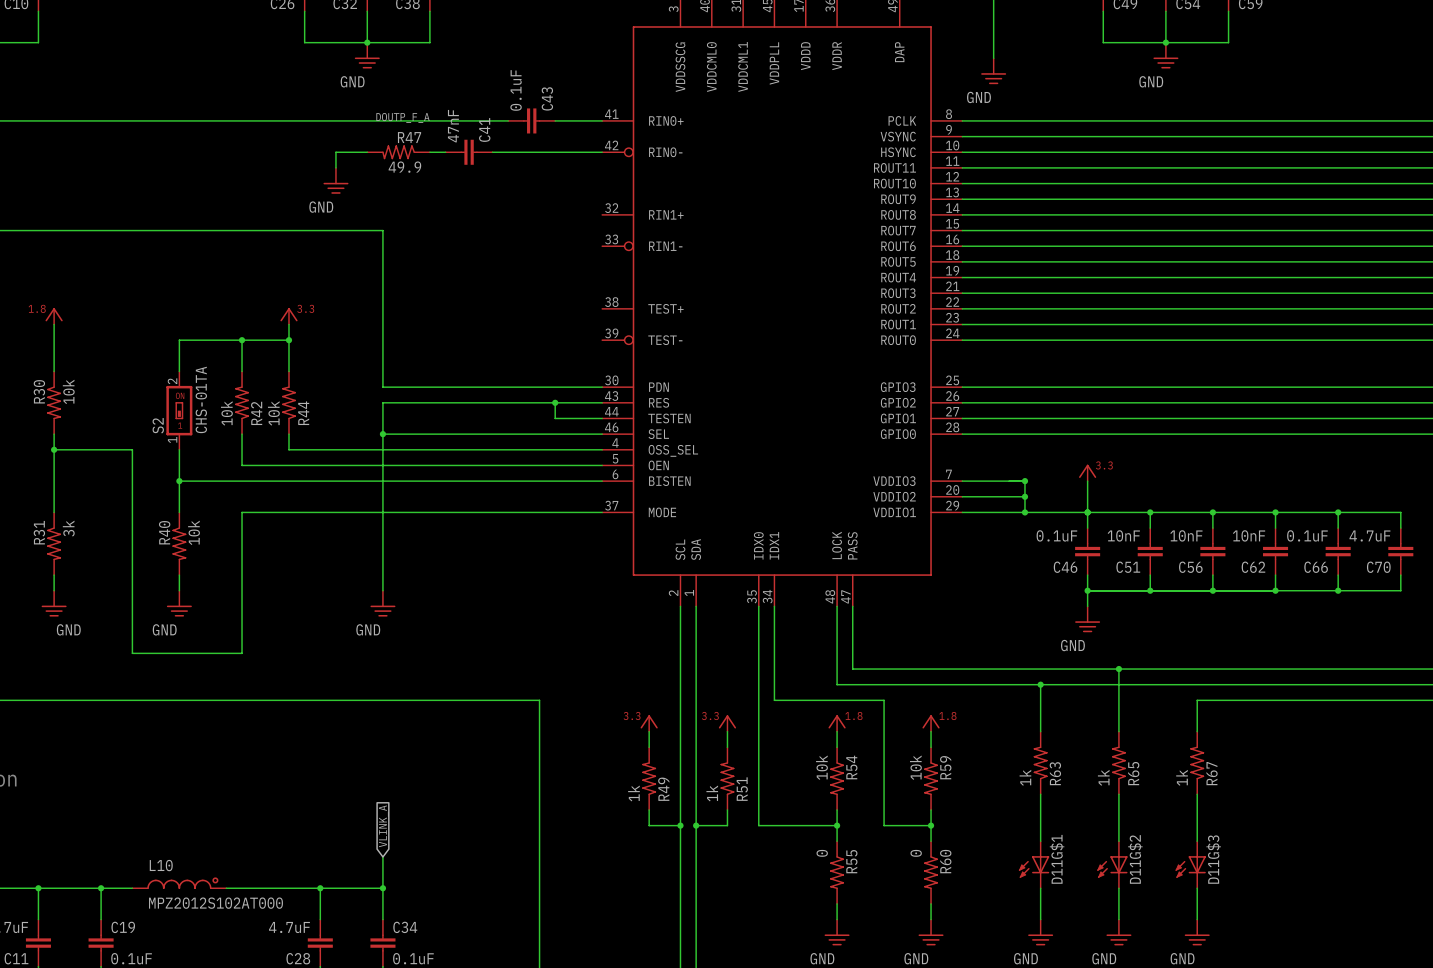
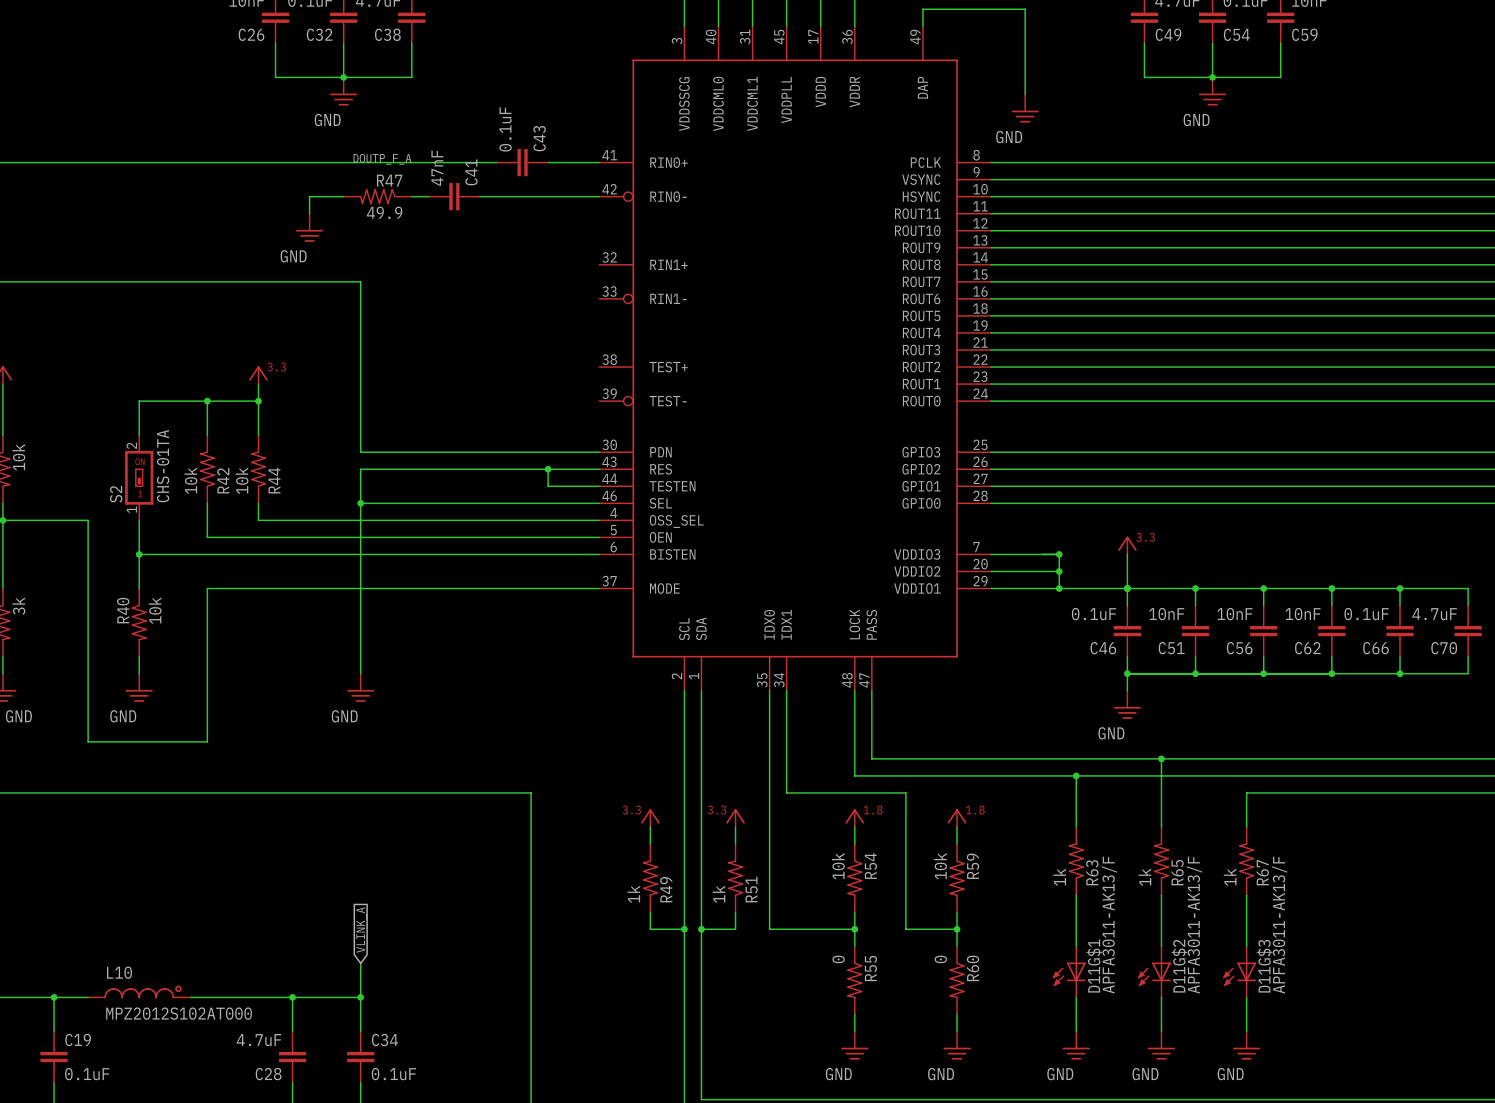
D11G$1 value: none -> APFA3011-AK13/F (1109, 925)
D11G$2 value: none -> APFA3011-AK13/F (1194, 925)
D11G$3 value: none -> APFA3011-AK13/F (1279, 925)

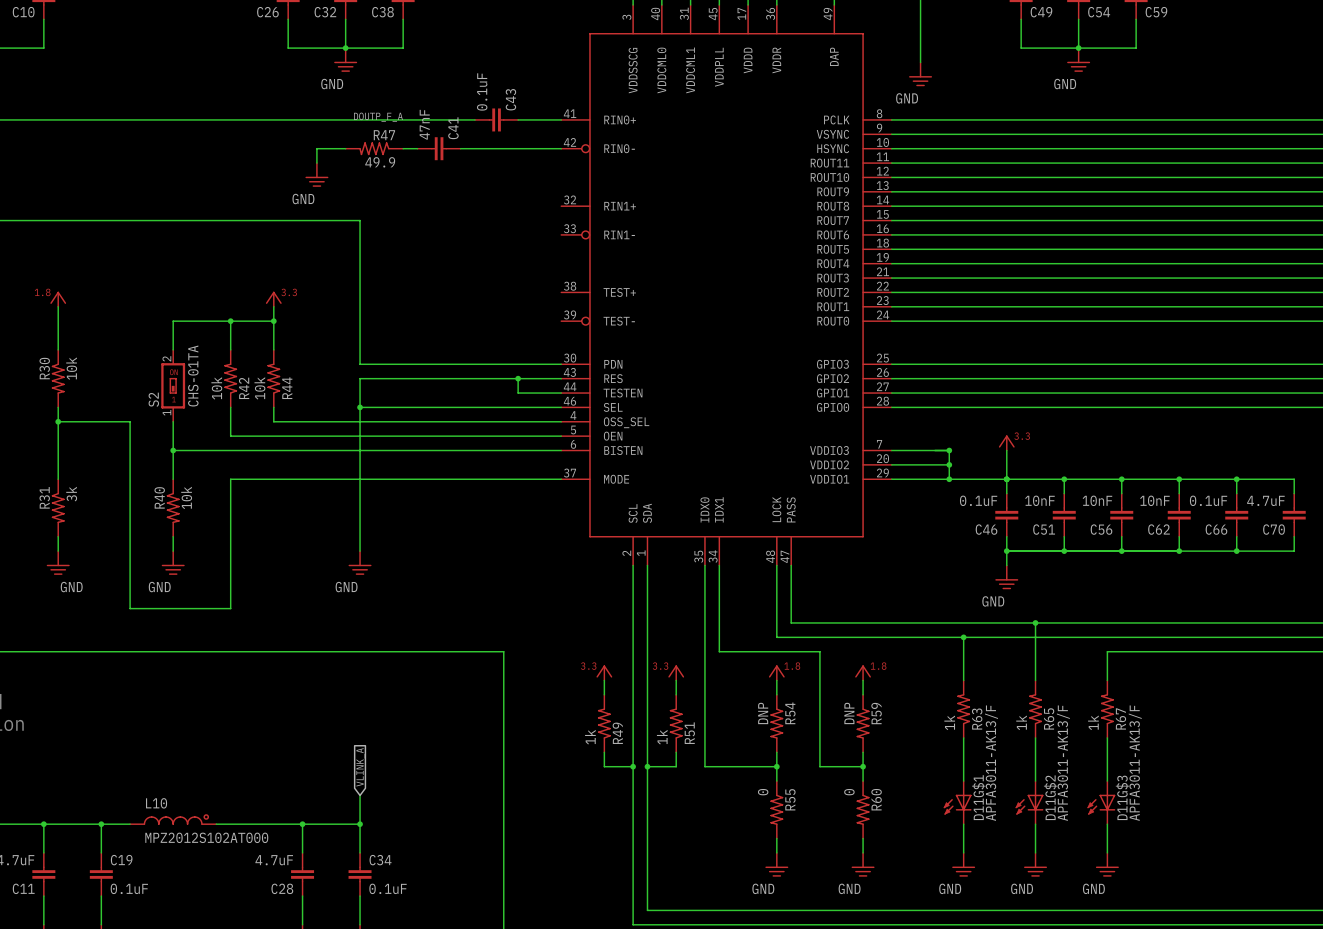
R54 value: 10k (838, 866) -> DNP (763, 713)
R59 value: 10k (940, 866) -> DNP (849, 713)

